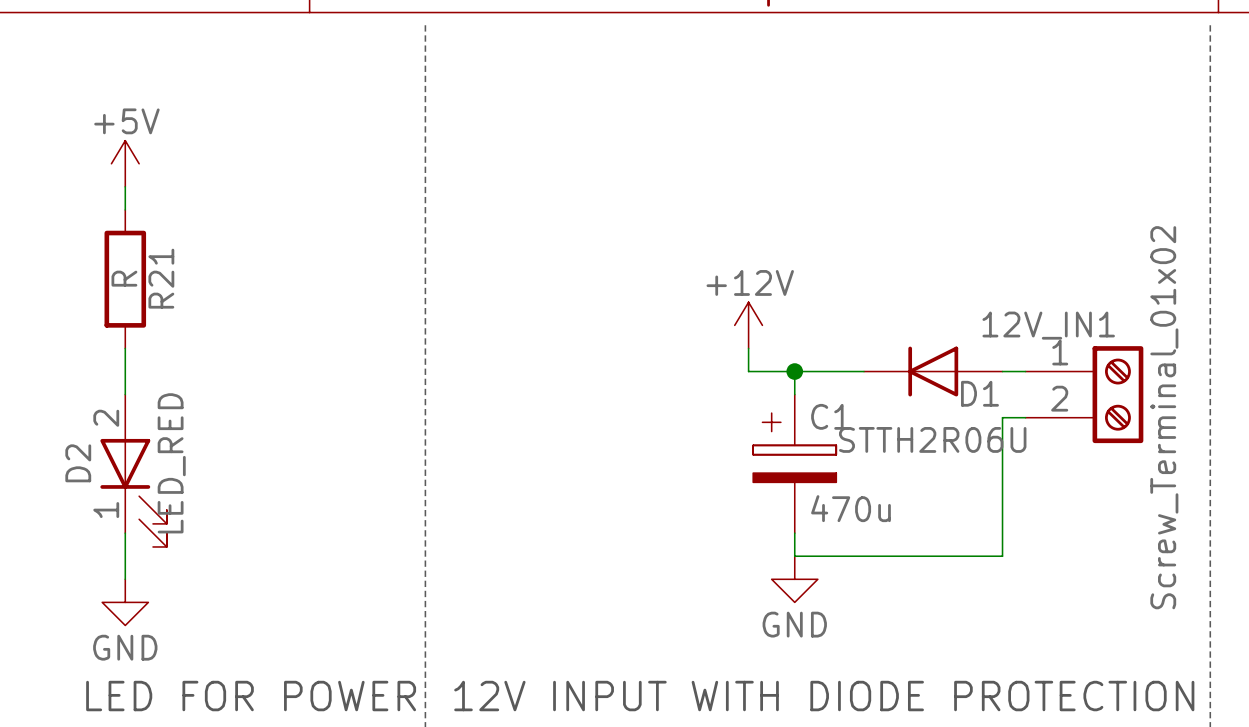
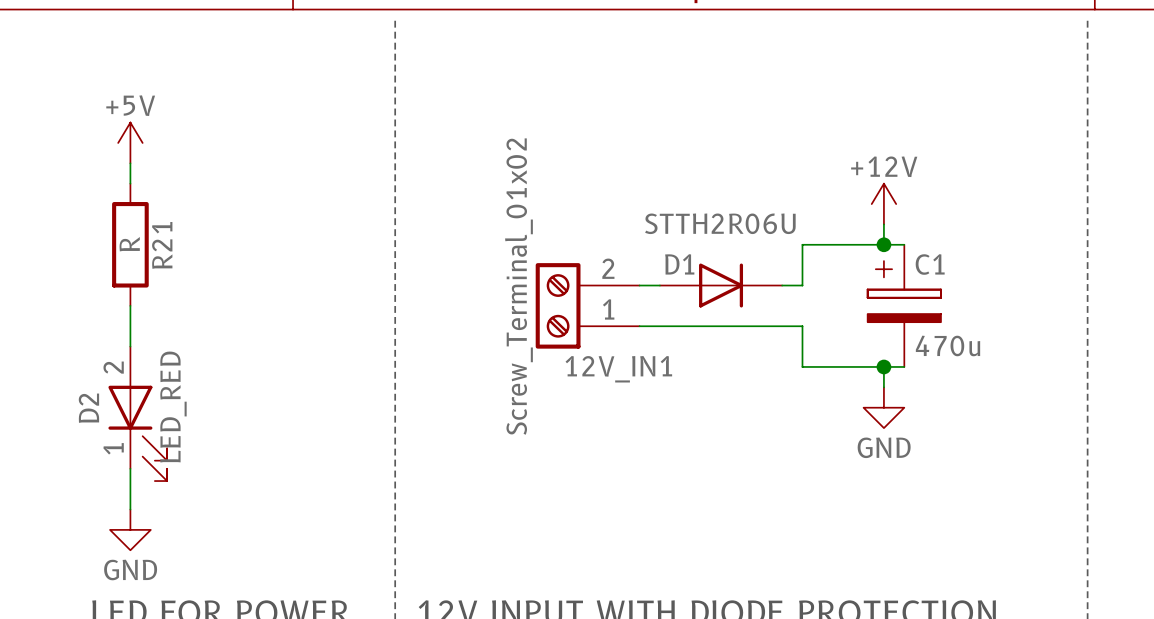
wire: none -> (883, 224) (883, 244)
junction: none -> (883, 244)
wire: none -> (904, 244) (802, 244) (802, 285) (782, 285)
power symbol position: +12V (748, 325) -> +12V (883, 204)
wire: (748, 348) (748, 371) -> (639, 326) (680, 326)
wire: (794, 371) (794, 394) -> (883, 366) (883, 387)
junction: (794, 371) -> none
wire: none -> (782, 326) (802, 326) (802, 366) (904, 366)
D1 rotation: 0° (933, 371) -> 180° (721, 285)
D1 position: (933, 371) -> (721, 285)
wire: (1002, 371) (1025, 371) -> (639, 285) (659, 285)
12V_IN1 position: (1084, 394) -> (587, 305)
12V_IN1 rotation: 0° (1117, 394) -> 180° (558, 305)
junction: none -> (883, 366)
wire: (1025, 417) (1002, 417) (1002, 556) (794, 556) (794, 533) -> none
C1 position: (794, 463) -> (904, 305)
power symbol position: GND (794, 579) -> GND (883, 407)

